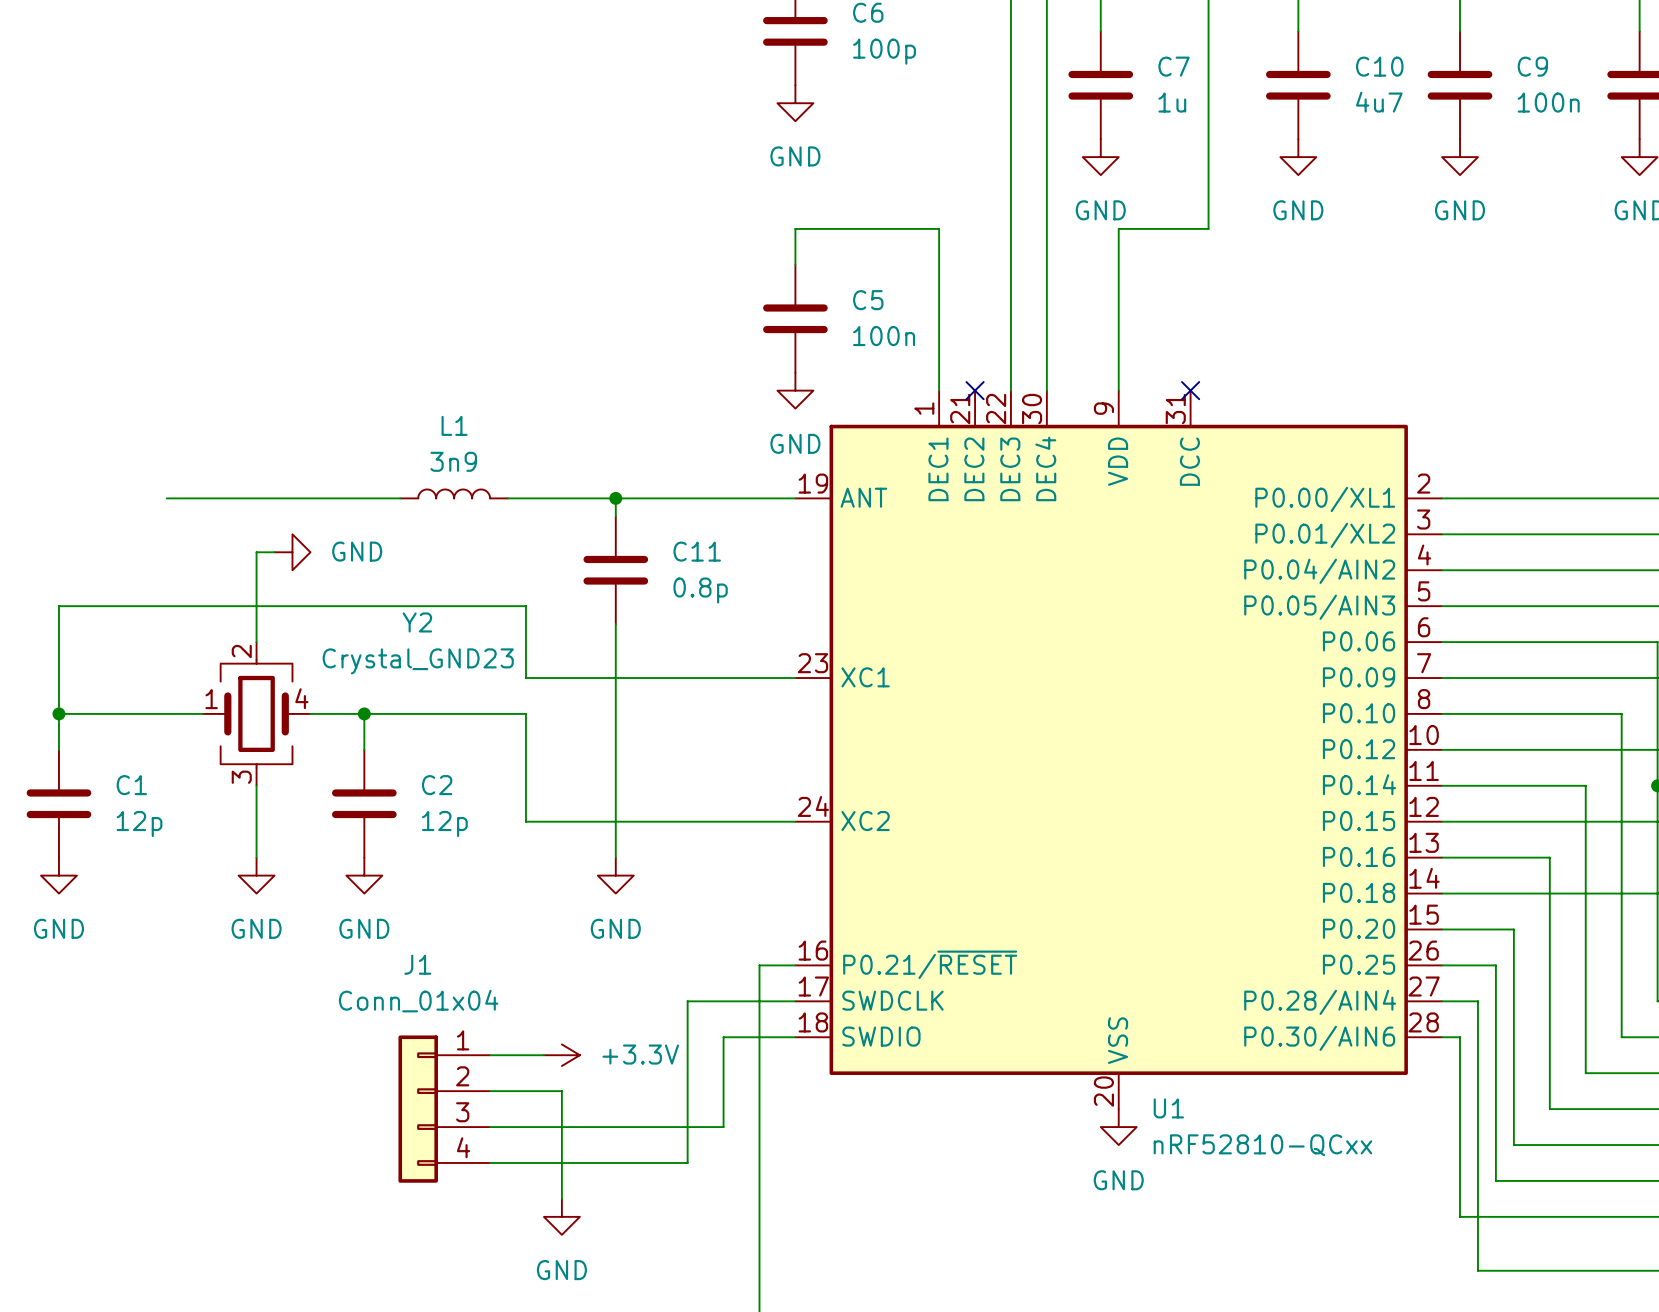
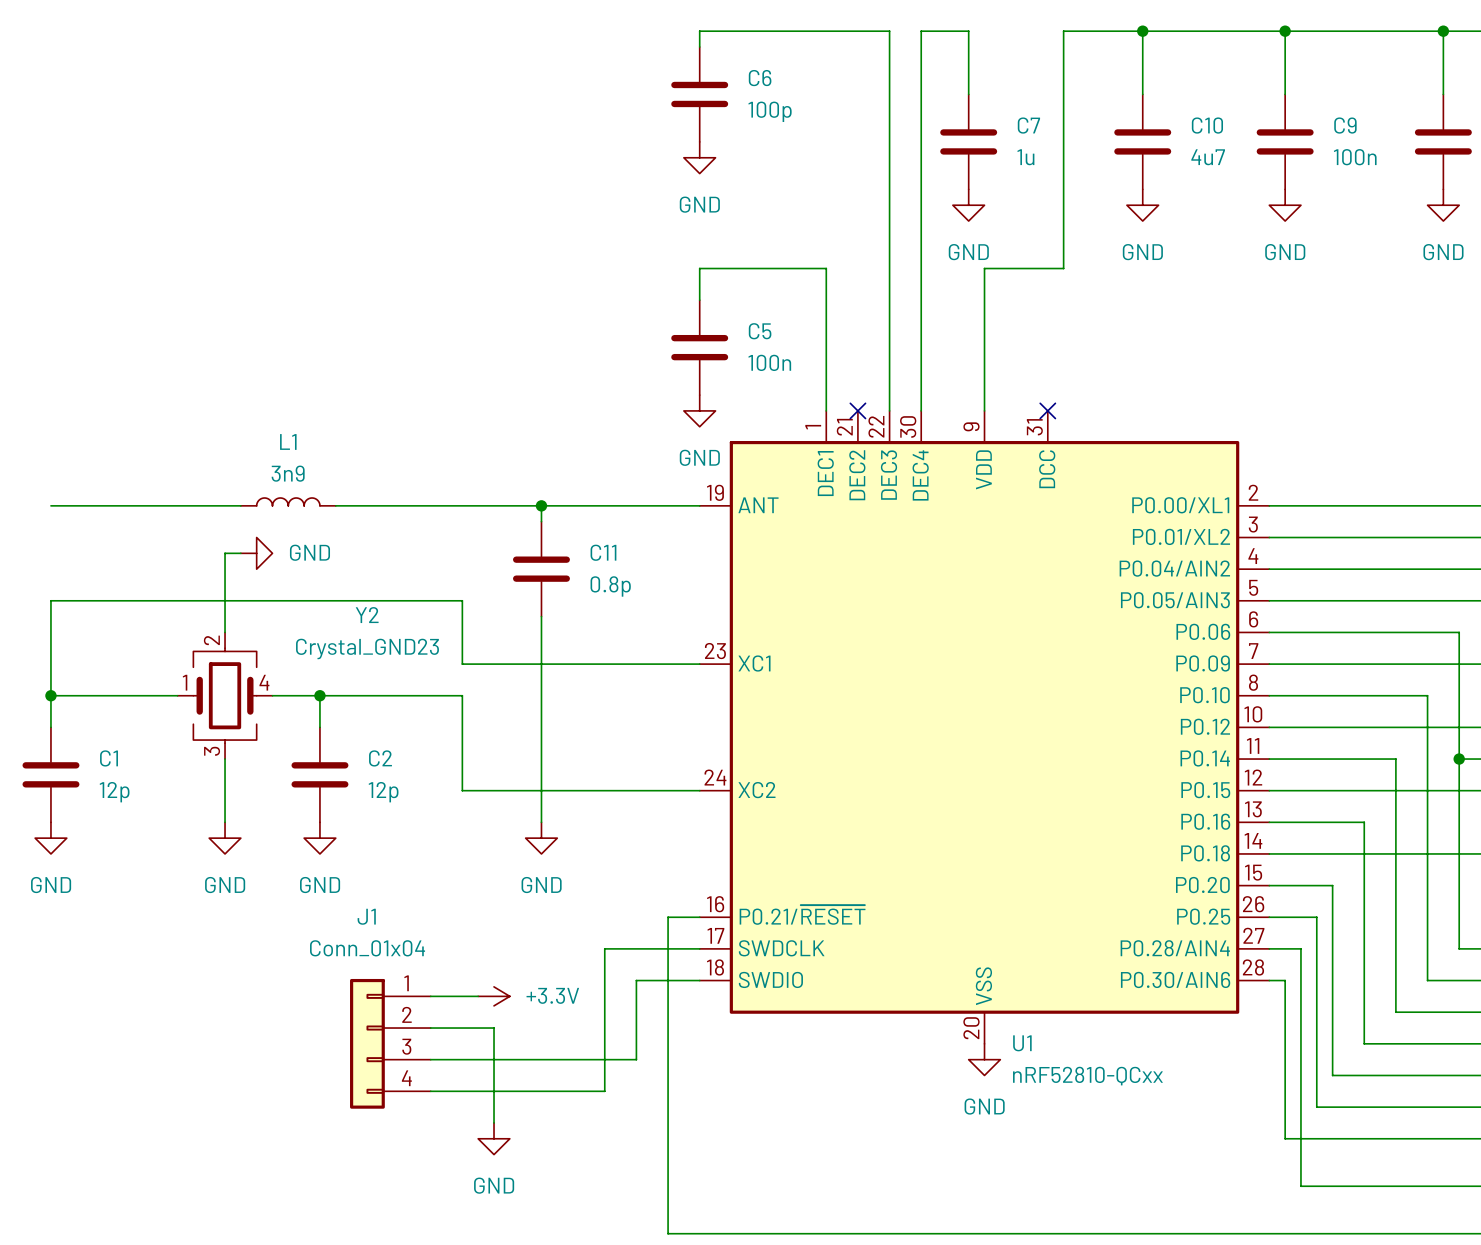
L1 position: (454, 493) -> (288, 501)
wire: none -> (50, 505) (145, 505)
wire: (274, 498) (382, 498) -> (351, 505) (446, 505)

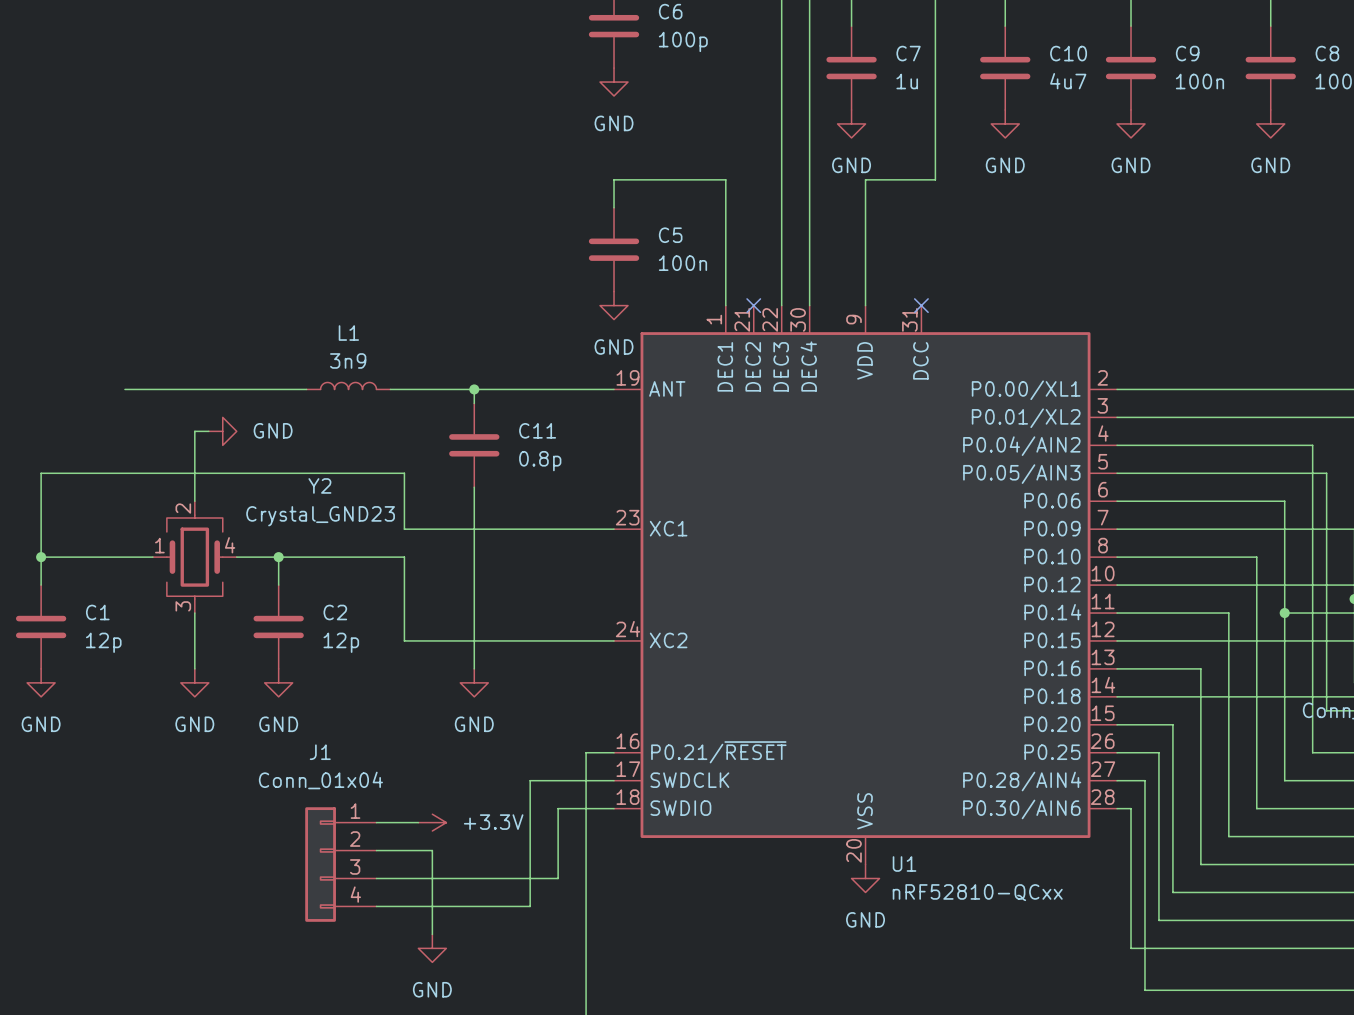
L1 position: (288, 501) -> (348, 385)
wire: (50, 505) (145, 505) -> none
wire: (351, 505) (446, 505) -> (208, 389) (292, 389)

